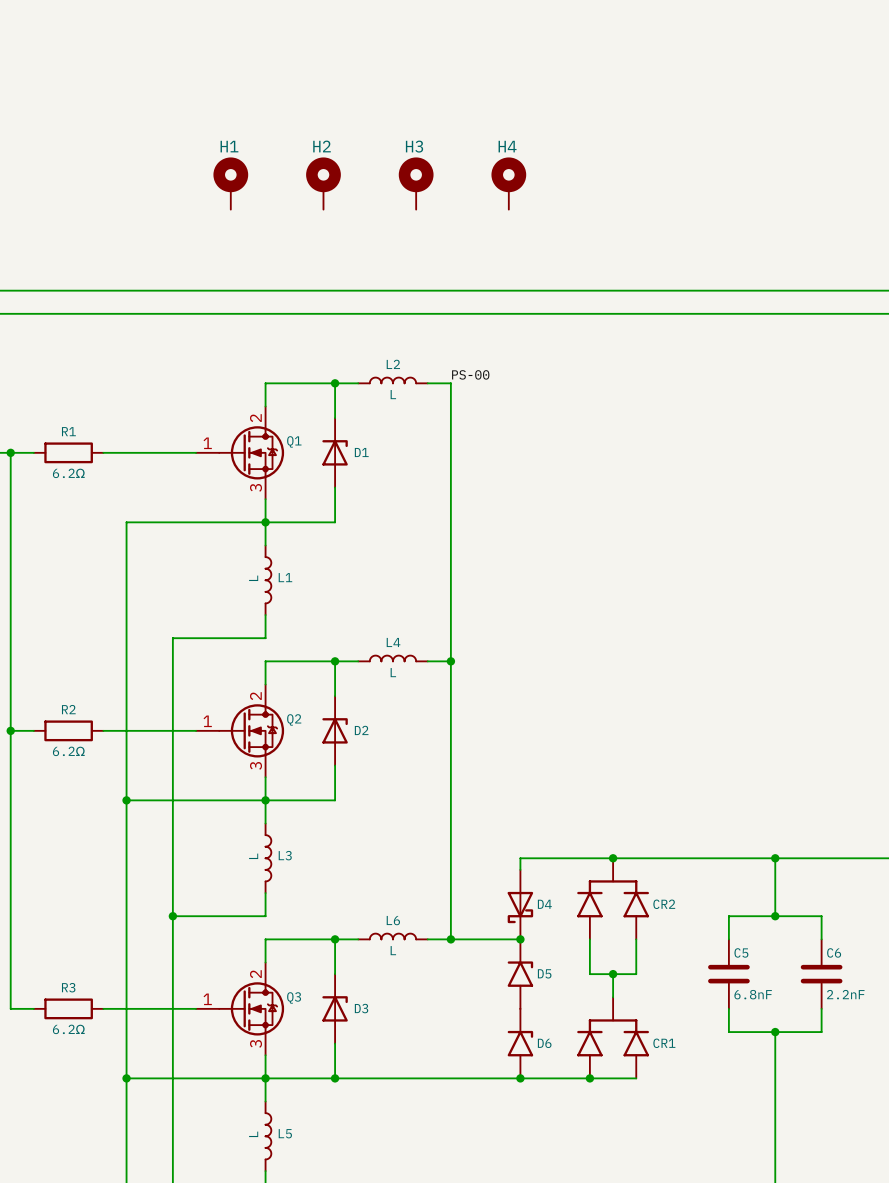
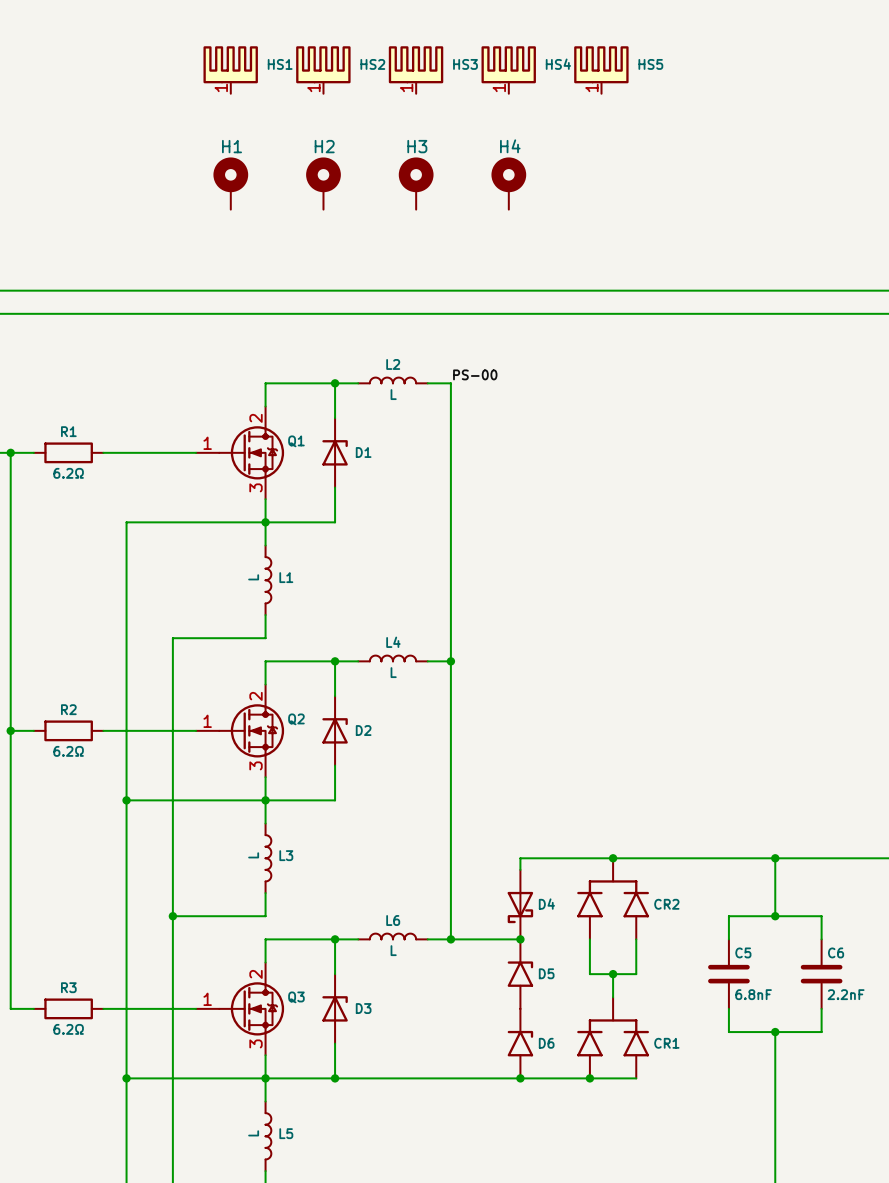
HS1: none -> (230, 69)
HS2: none -> (323, 69)
HS3: none -> (416, 69)
HS4: none -> (508, 69)
HS5: none -> (601, 69)

